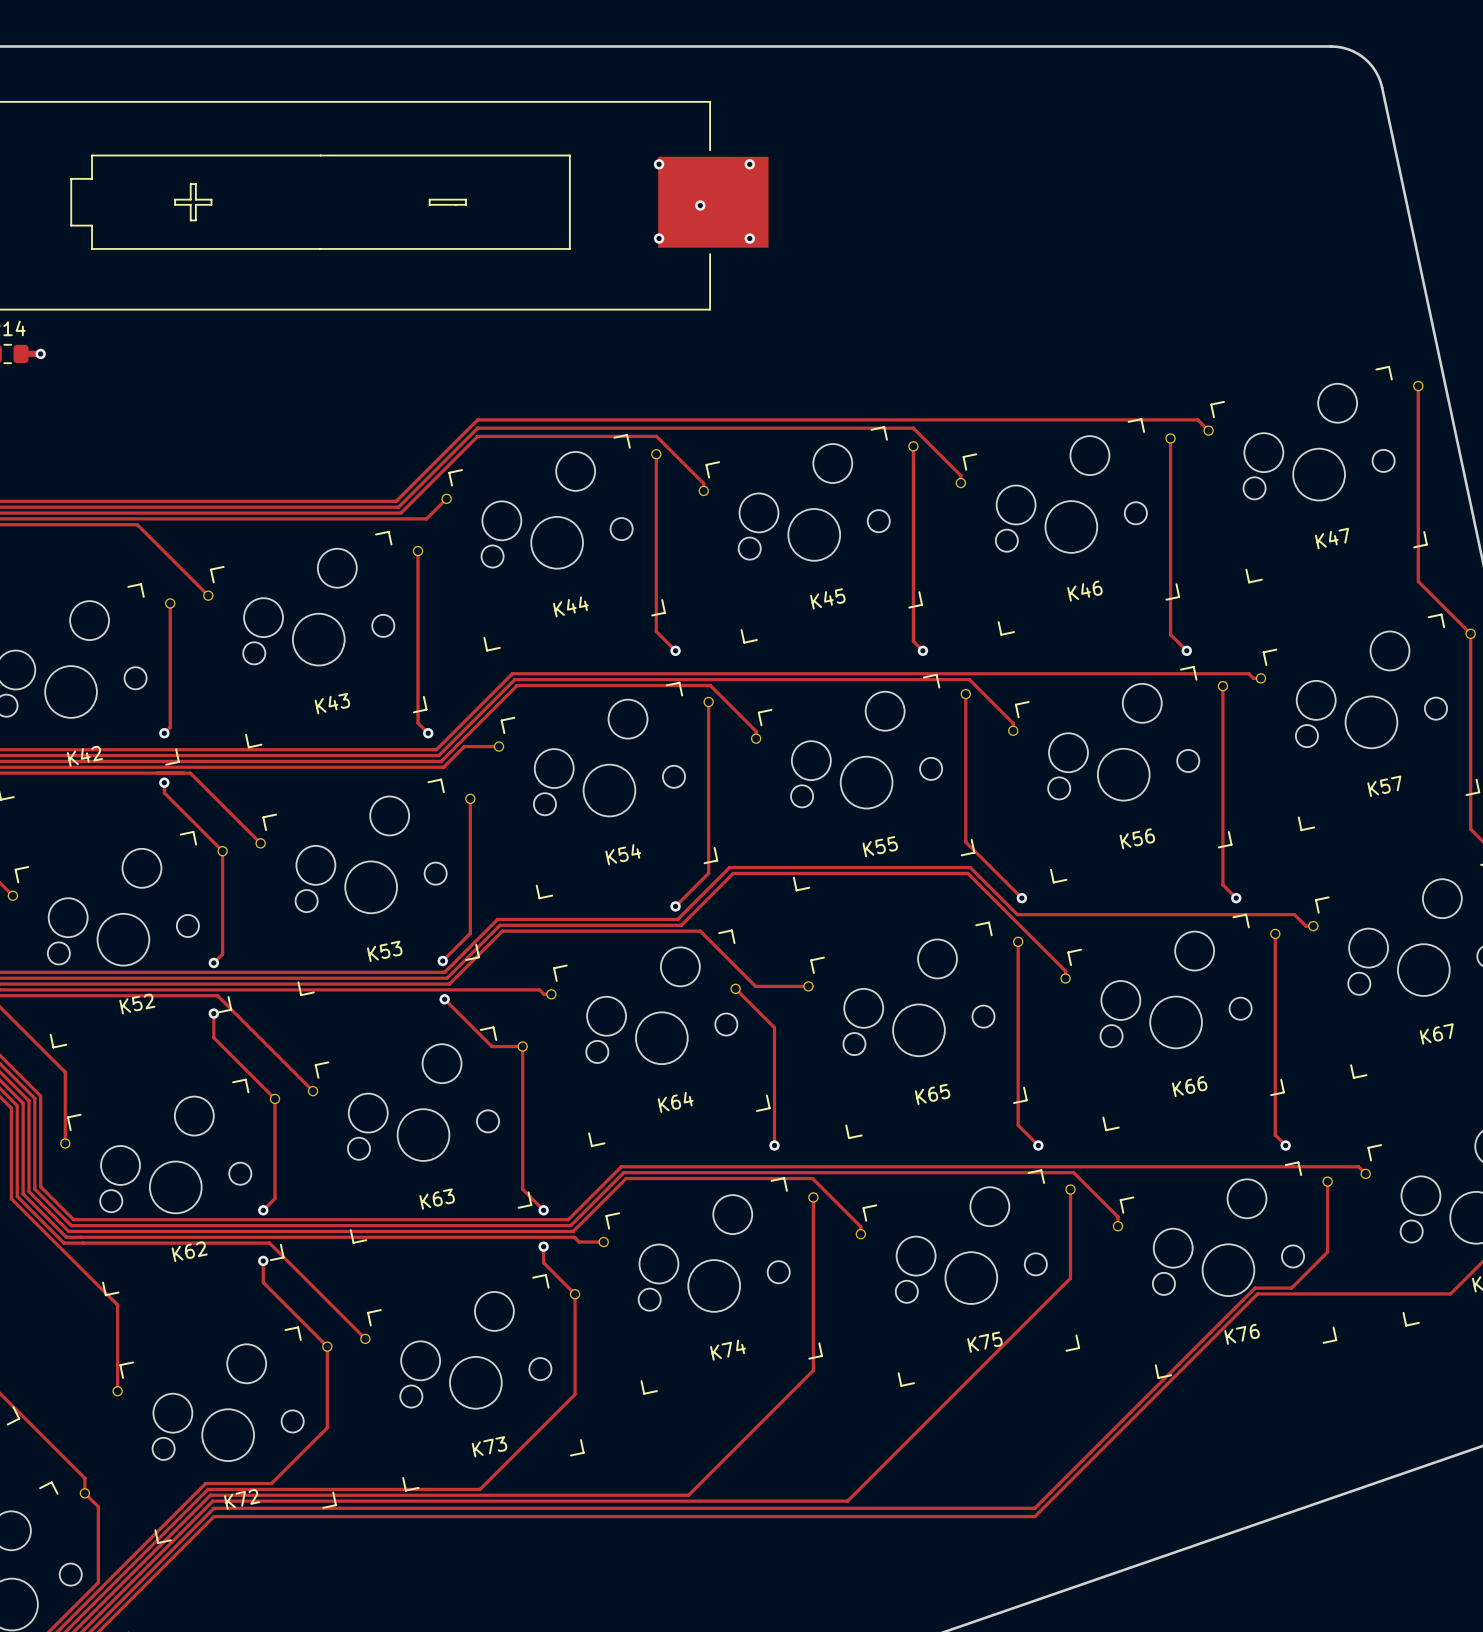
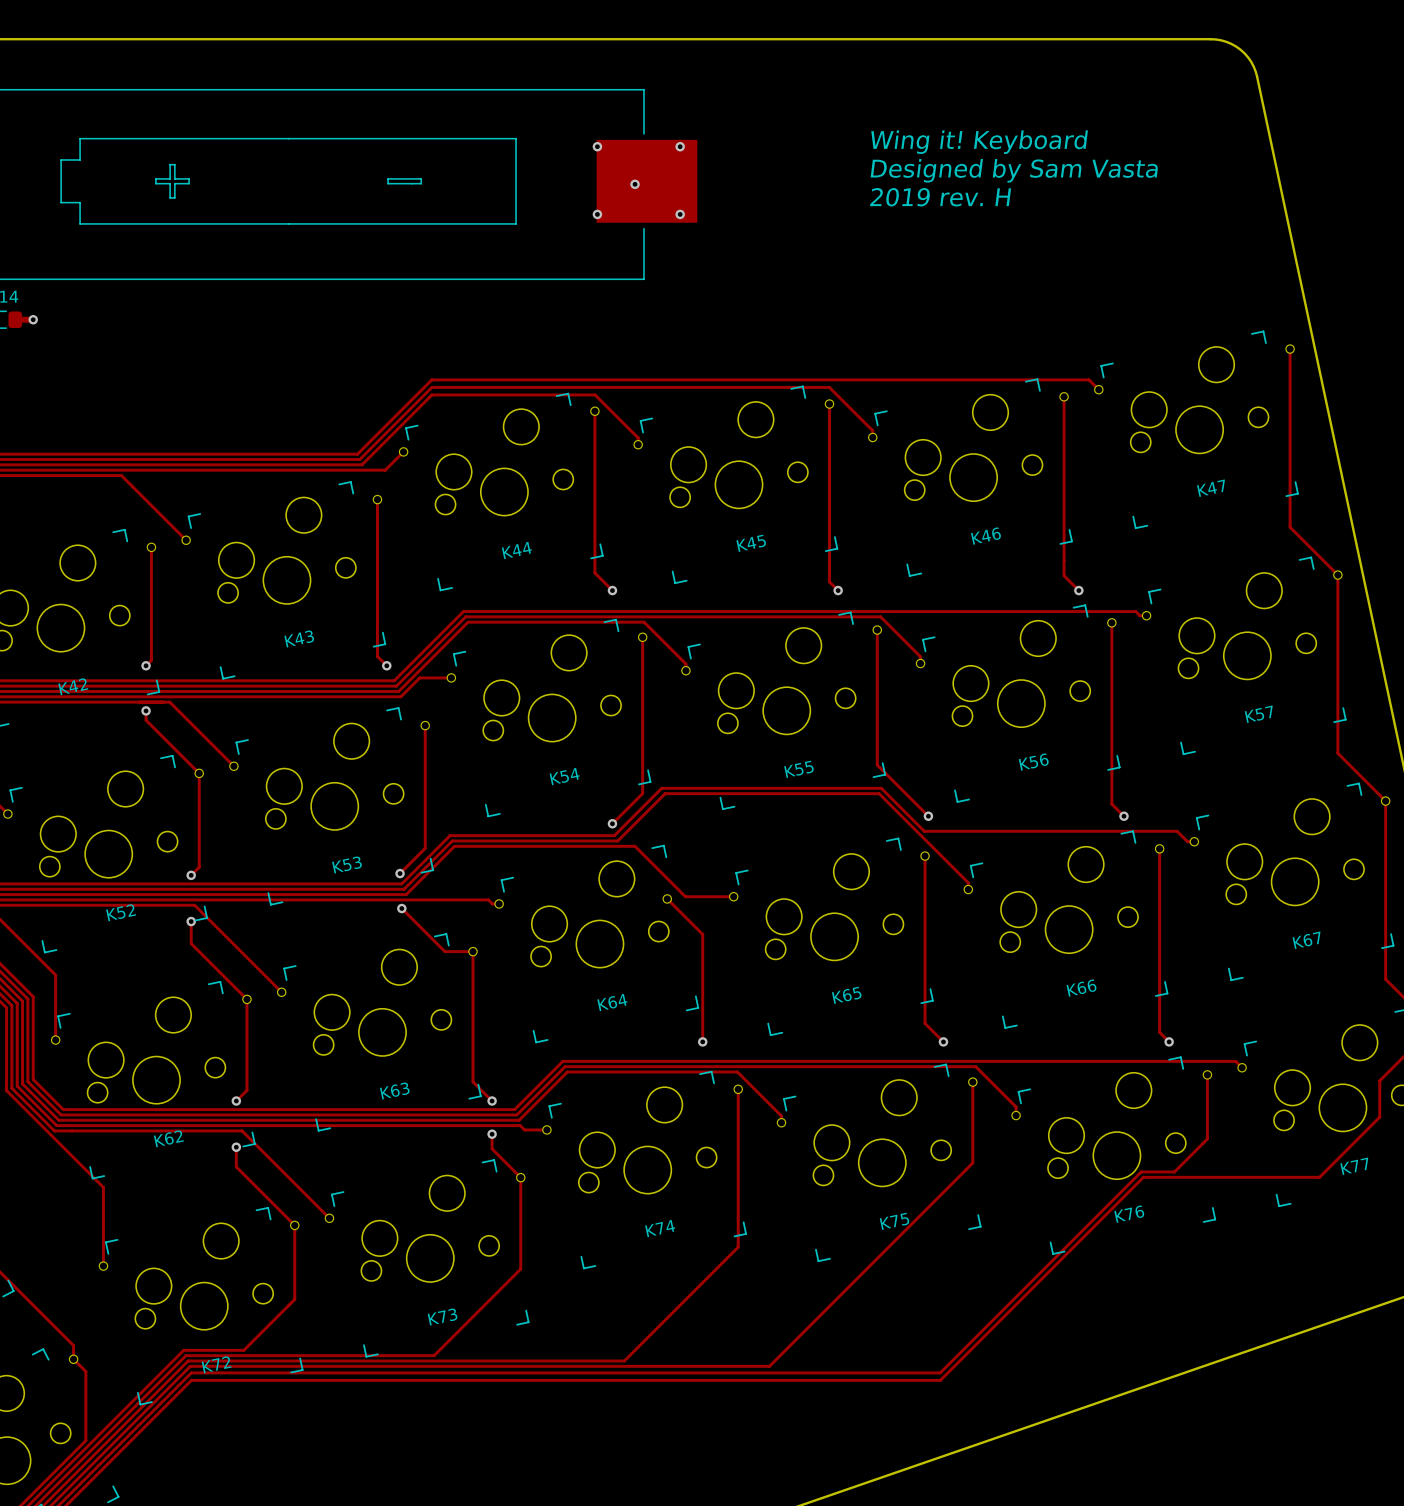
text: none -> Wing it! Keyboard (979, 142)
text: none -> Designed by Sam Vasta (1014, 170)
text: none -> 2019 rev. H (940, 197)

